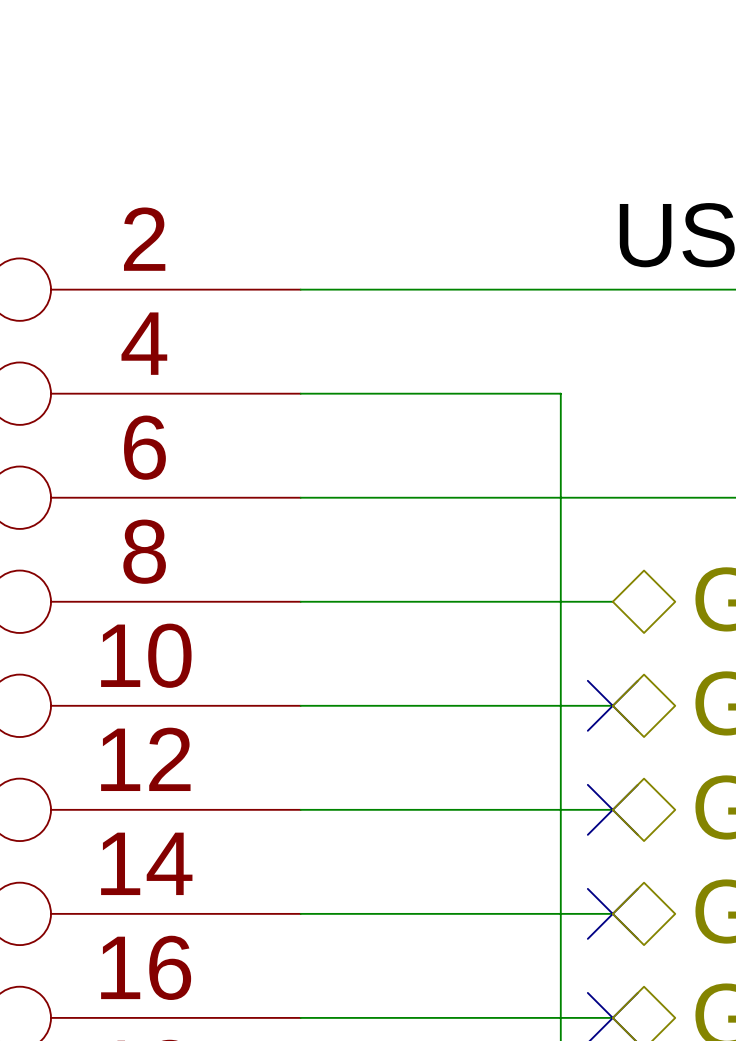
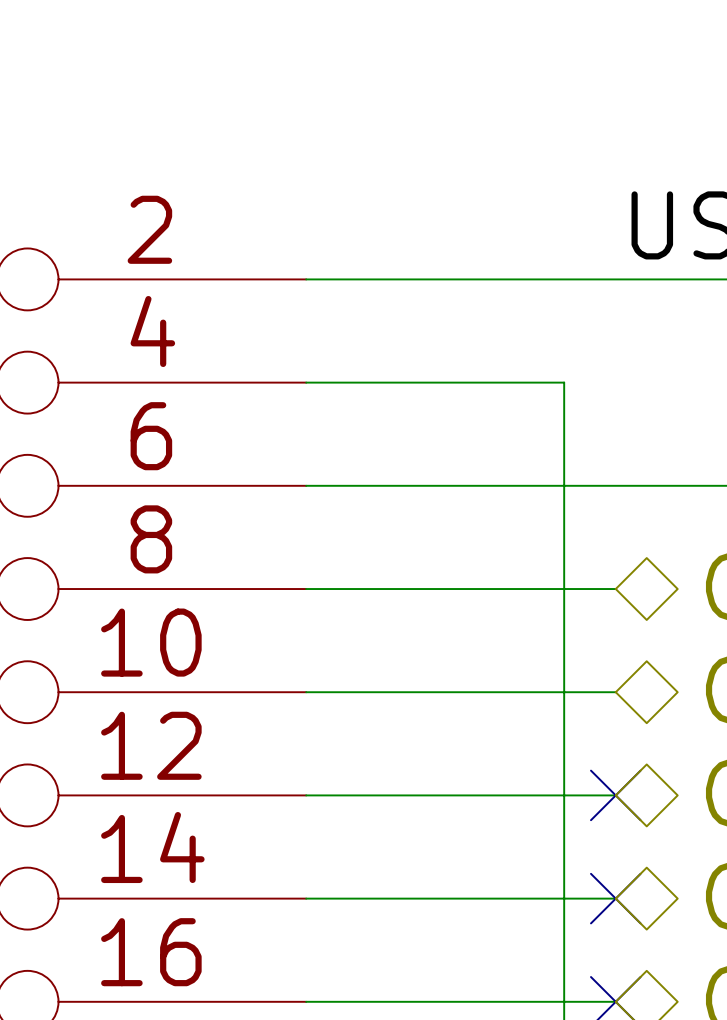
no-connect mark: (612, 705) -> none

